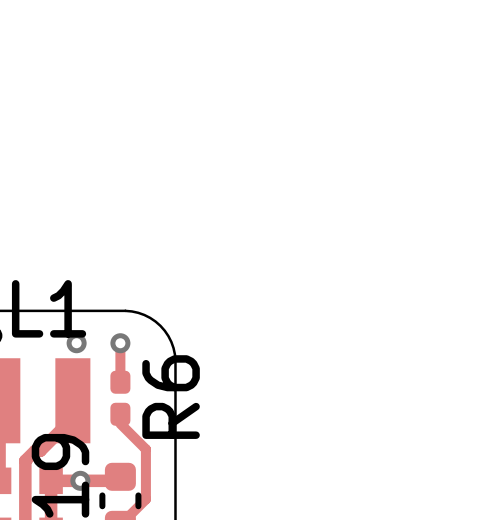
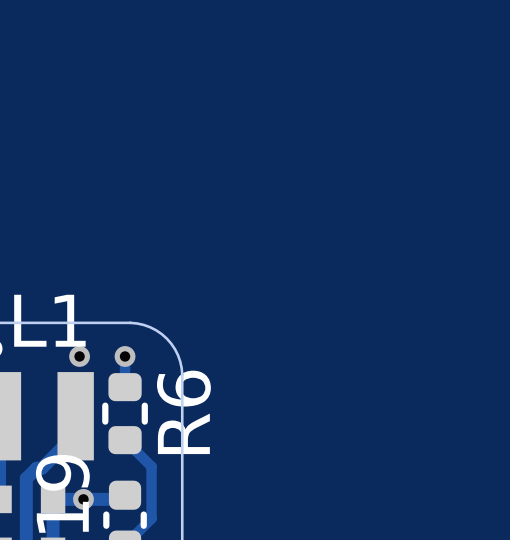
R6 footprint: [110, 370, 131, 426] -> [102, 373, 148, 455]

